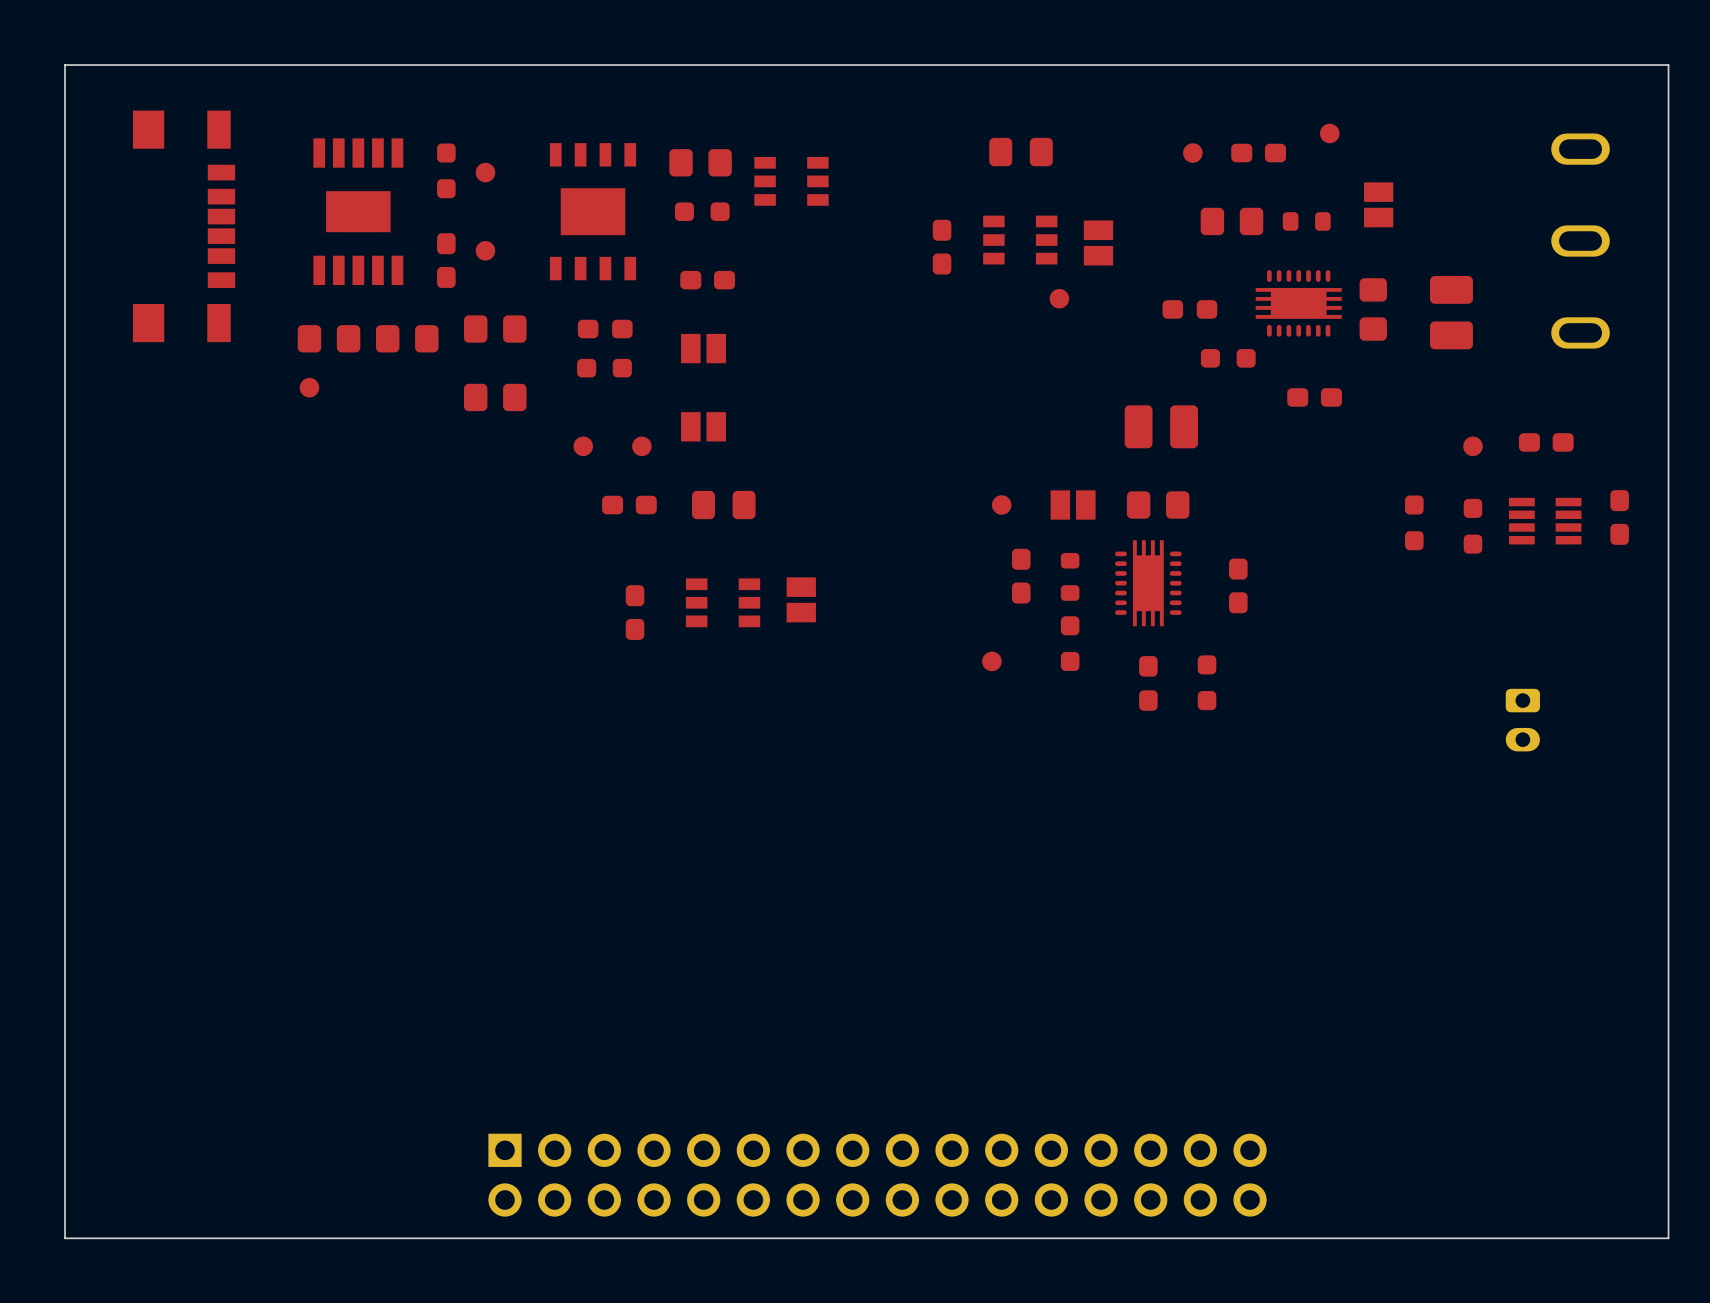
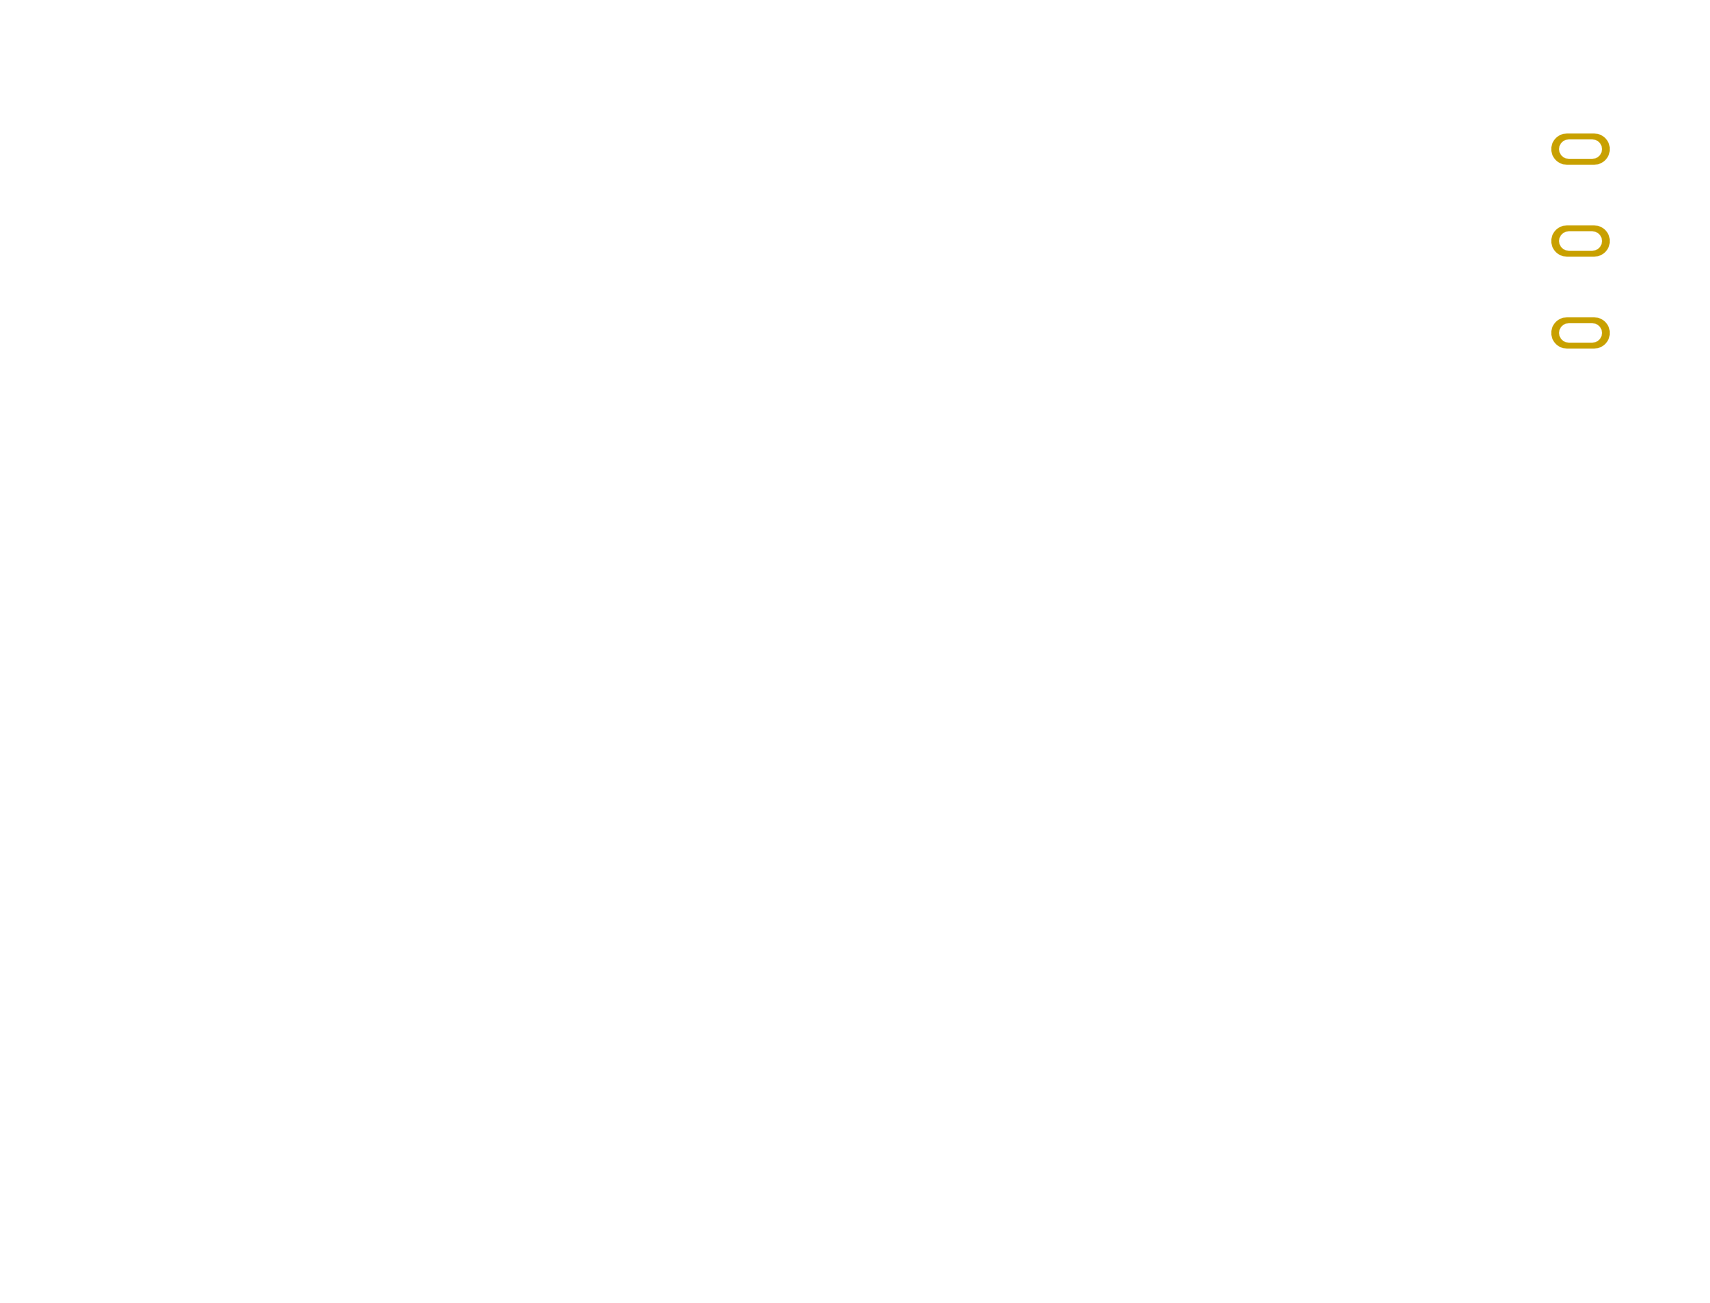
board edge: (1668, 65) (65, 65) (65, 1238) (1668, 1238) (1668, 65) -> none
part: (1329, 133) -> none
part: (1021, 152) -> none
part: (1192, 153) -> none
part: (1258, 153) -> none
part: (700, 162) -> none
part: (446, 170) -> none
part: (485, 172) -> none
part: (791, 181) -> none
part: (1378, 204) -> none
part: (358, 211) -> none
part: (593, 211) -> none
part: (702, 211) -> none
part: (1231, 221) -> none
part: (1306, 221) -> none
part: (184, 226) -> none
part: (1020, 240) -> none
part: (1098, 242) -> none
part: (942, 247) -> none
part: (485, 250) -> none
part: (446, 260) -> none
part: (707, 280) -> none
part: (1059, 298) -> none
part: (1298, 303) -> none
part: (1189, 309) -> none
part: (1373, 309) -> none
part: (1451, 312) -> none
part: (495, 329) -> none
part: (605, 329) -> none
part: (329, 338) -> none
part: (407, 338) -> none
part: (703, 348) -> none
part: (1228, 358) -> none
part: (604, 368) -> none
part: (309, 387) -> none
part: (495, 397) -> none
part: (1314, 397) -> none
part: (703, 426) -> none
part: (1161, 426) -> none
part: (1546, 442) -> none
part: (583, 446) -> none
part: (641, 446) -> none
part: (1472, 446) -> none
part: (629, 505) -> none
part: (723, 505) -> none
part: (1001, 505) -> none
part: (1073, 505) -> none
part: (1158, 505) -> none
part: (1619, 517) -> none
part: (1545, 521) -> none
part: (1414, 522) -> none
part: (1472, 526) -> none
part: (1021, 576) -> none
part: (1070, 576) -> none
part: (1148, 583) -> none
part: (1238, 585) -> none
part: (801, 599) -> none
part: (723, 602) -> none
part: (635, 612) -> none
part: (1070, 643) -> none
part: (991, 661) -> none
part: (1207, 682) -> none
part: (1148, 683) -> none
part: (1522, 720) -> none
part: (877, 1175) -> none

